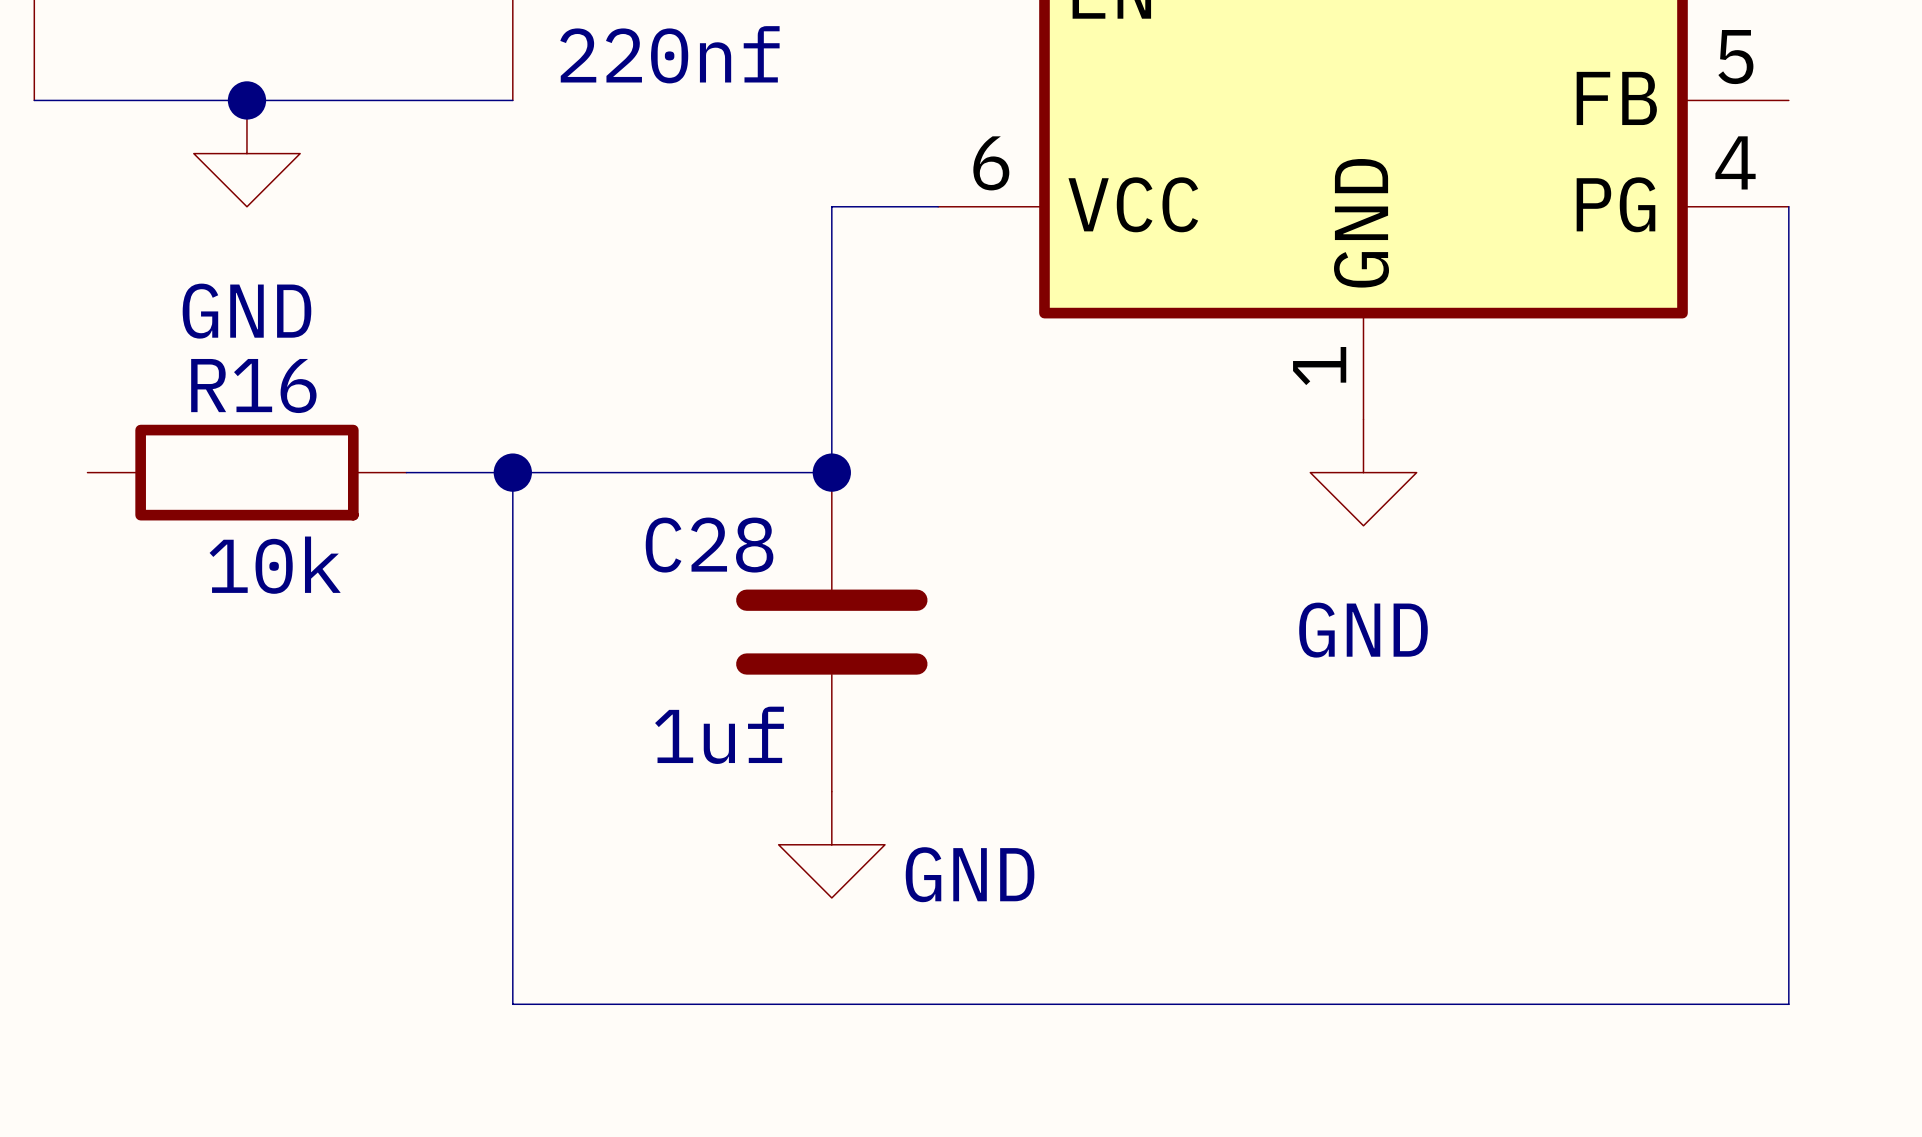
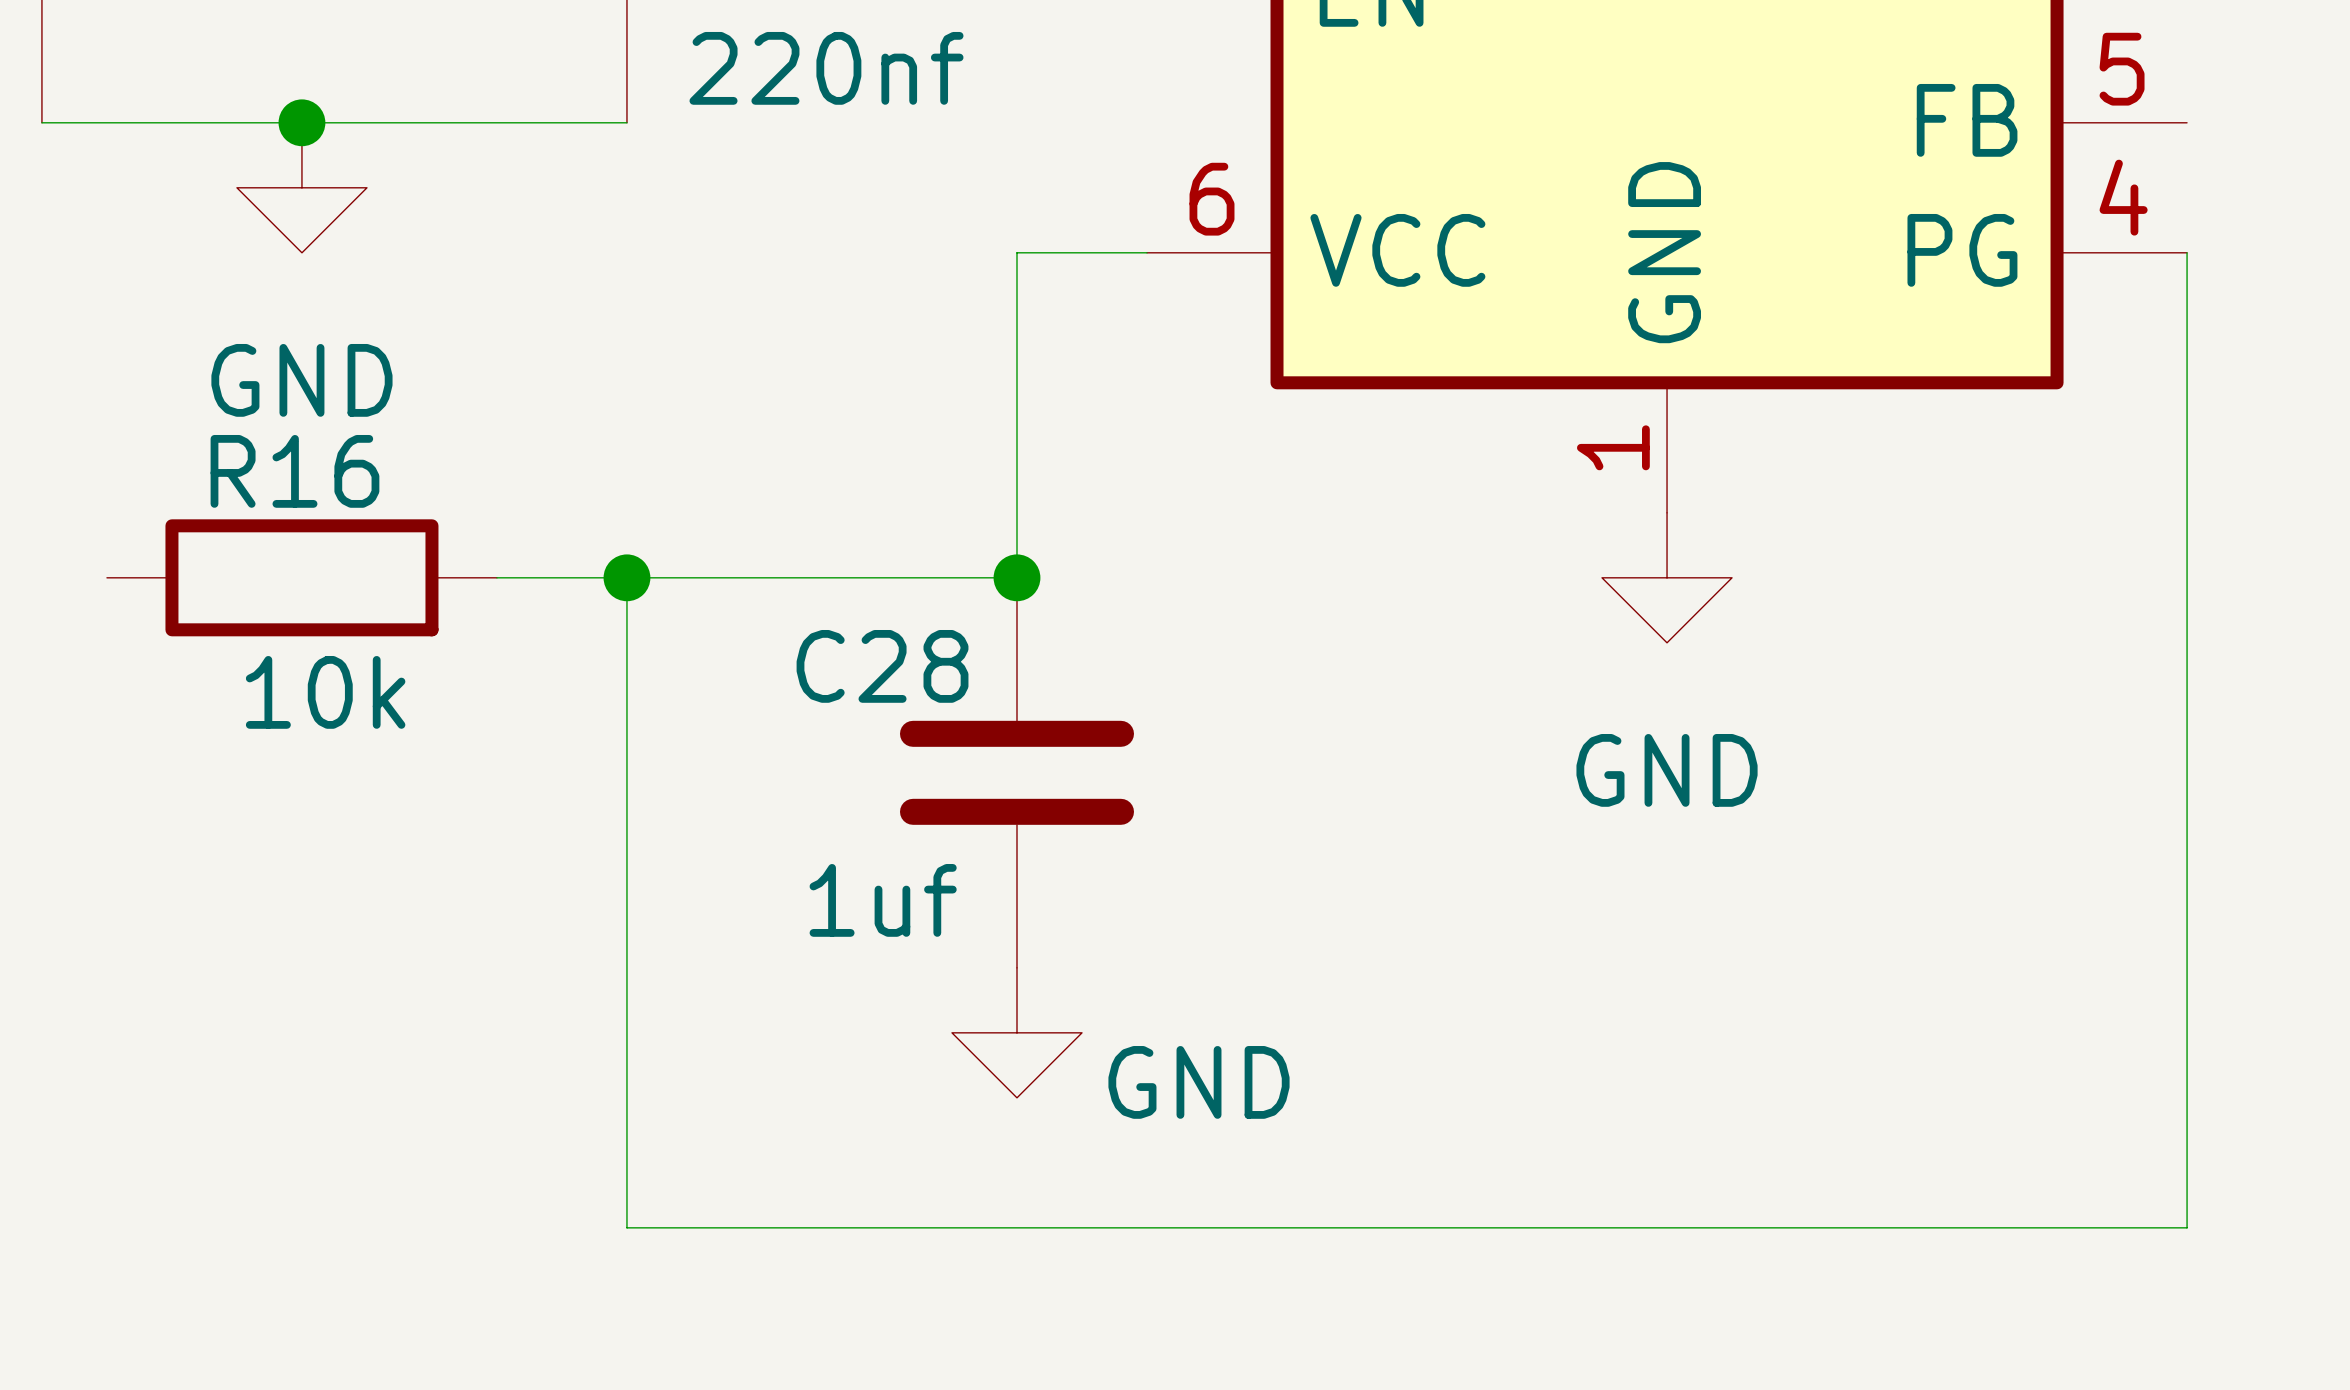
power symbol text position: GND (970, 874) -> GND (1199, 1082)

